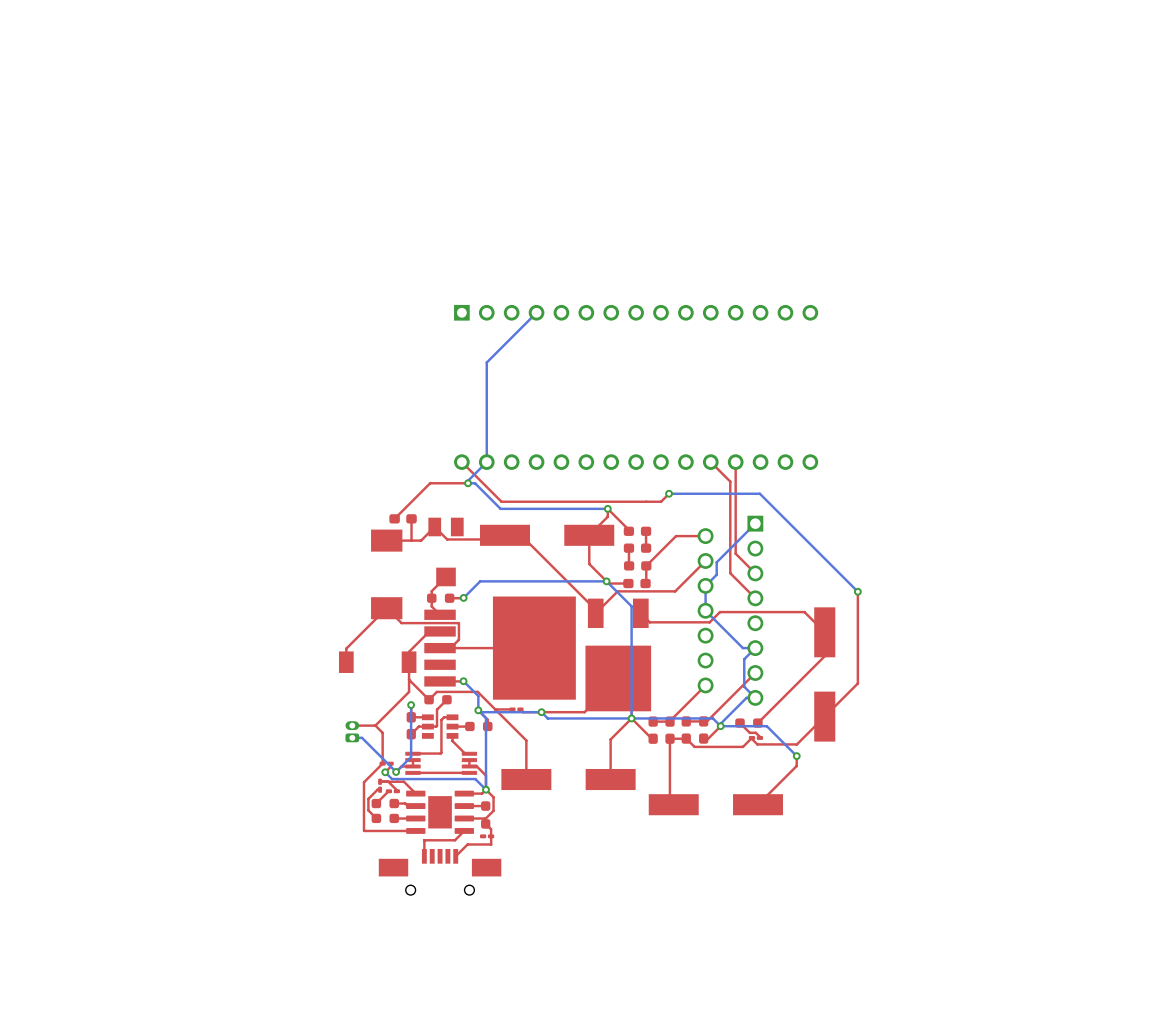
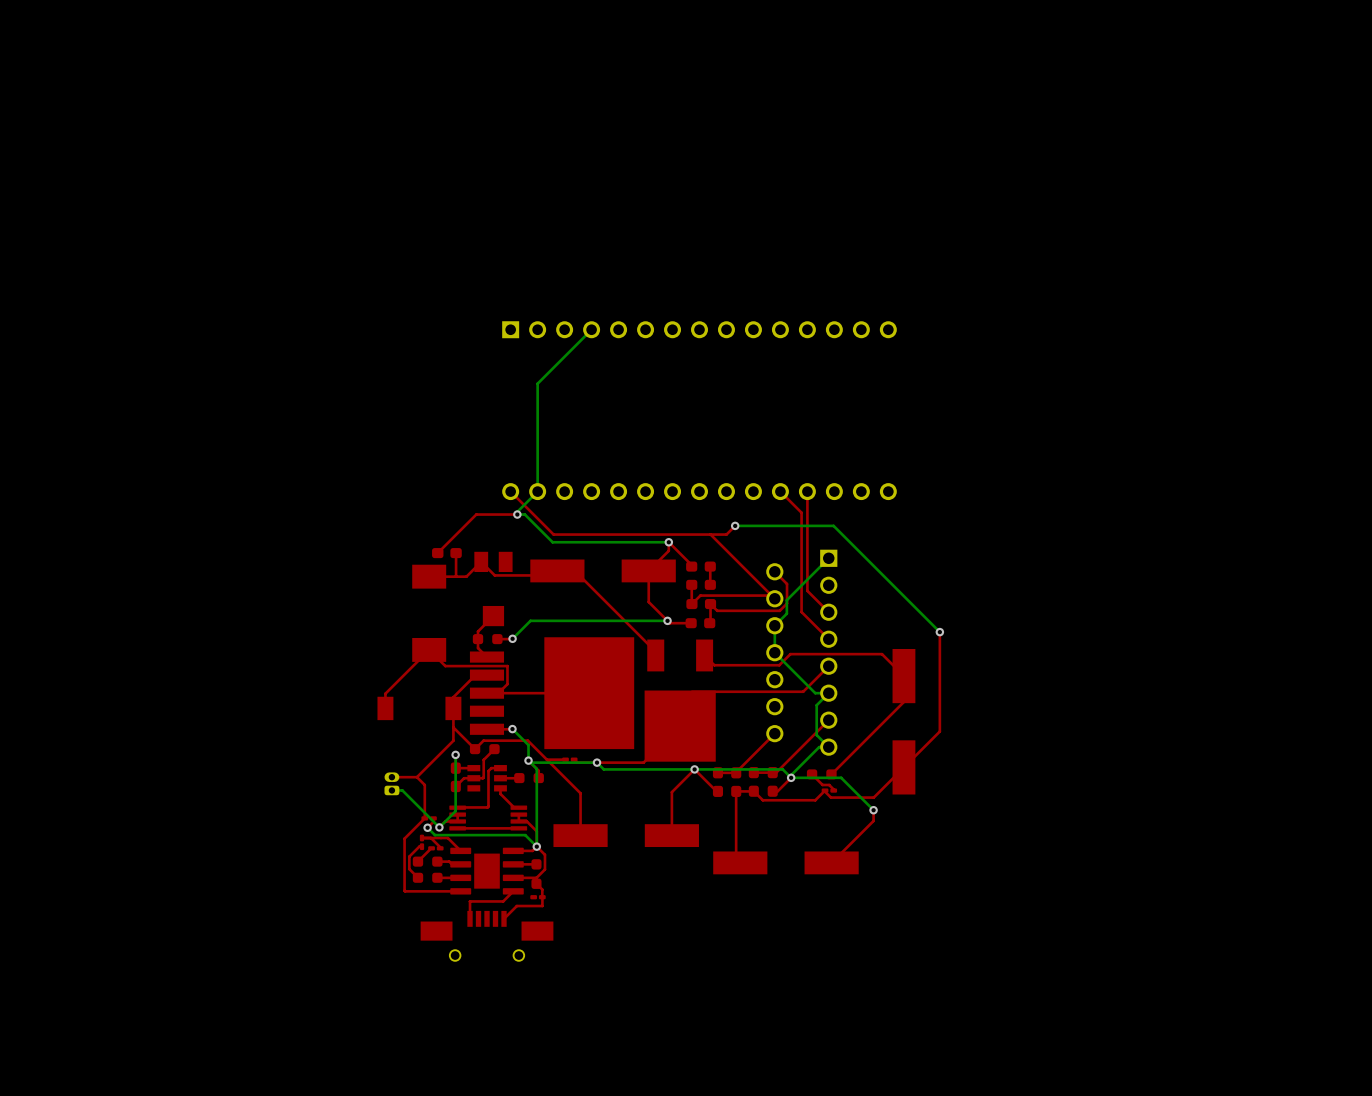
top track: (705, 536) (676, 536) (646, 565) -> (774, 571) (787, 583) (787, 603) (779, 610) (717, 610) (710, 604)
top track: none -> (771, 595) (700, 595) (691, 604)
top track: (705, 560) (675, 591) (617, 591) (595, 613) -> (774, 598) (710, 534)
bottom track: (606, 581) (631, 606) (631, 718) -> none
top track: none -> (828, 666) (803, 691) (692, 691)

